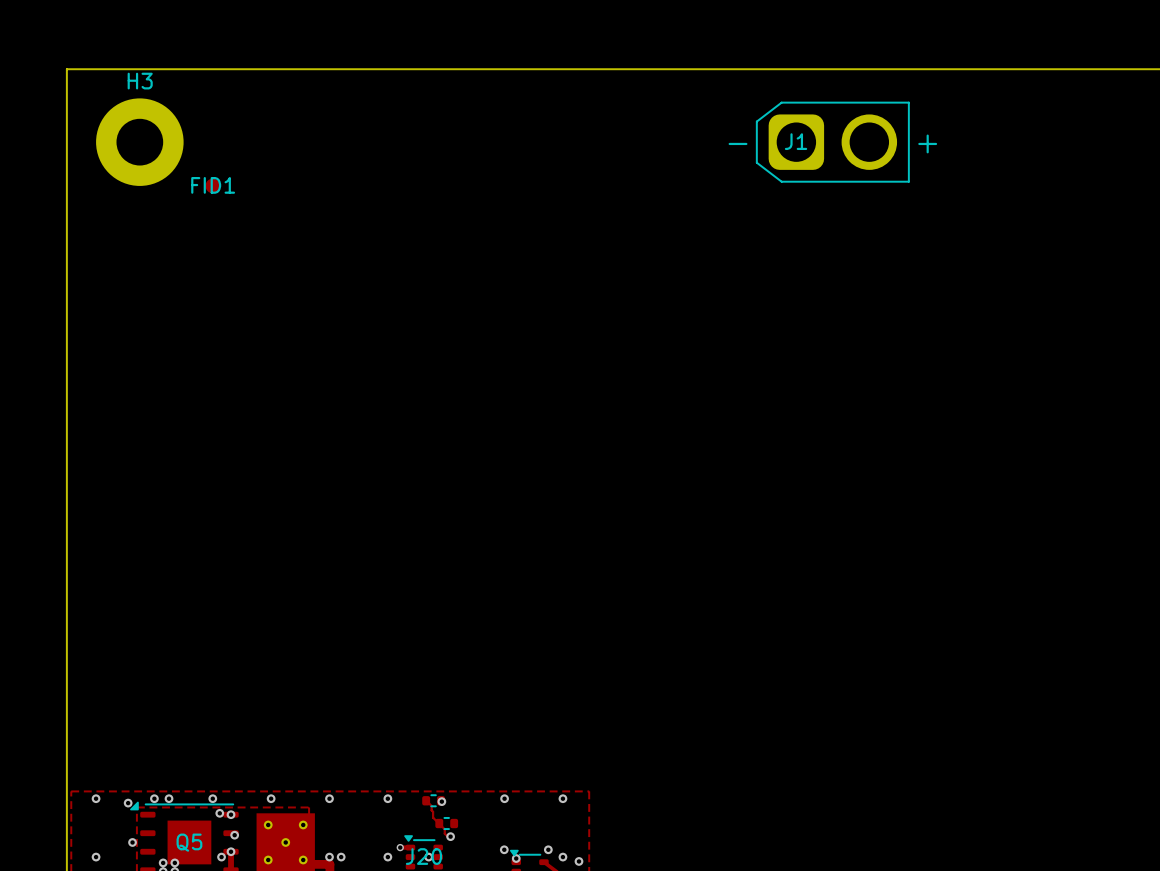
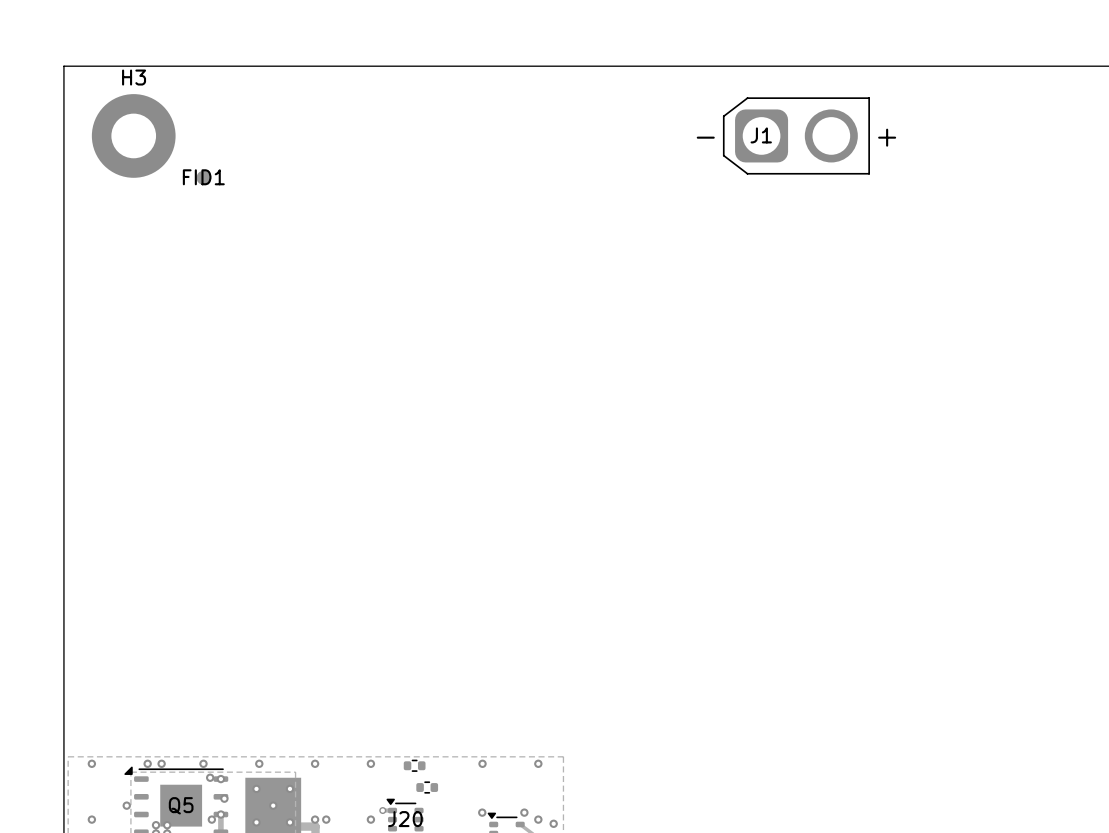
track: (427, 801) (431, 806) (433, 817) (437, 822) -> none
via: (441, 801) -> none
via: (128, 803) -> none
track: (440, 824) (444, 829) (444, 833) (450, 836) -> none
via: (450, 836) -> none
via: (428, 857) -> none
via: (516, 858) -> none

